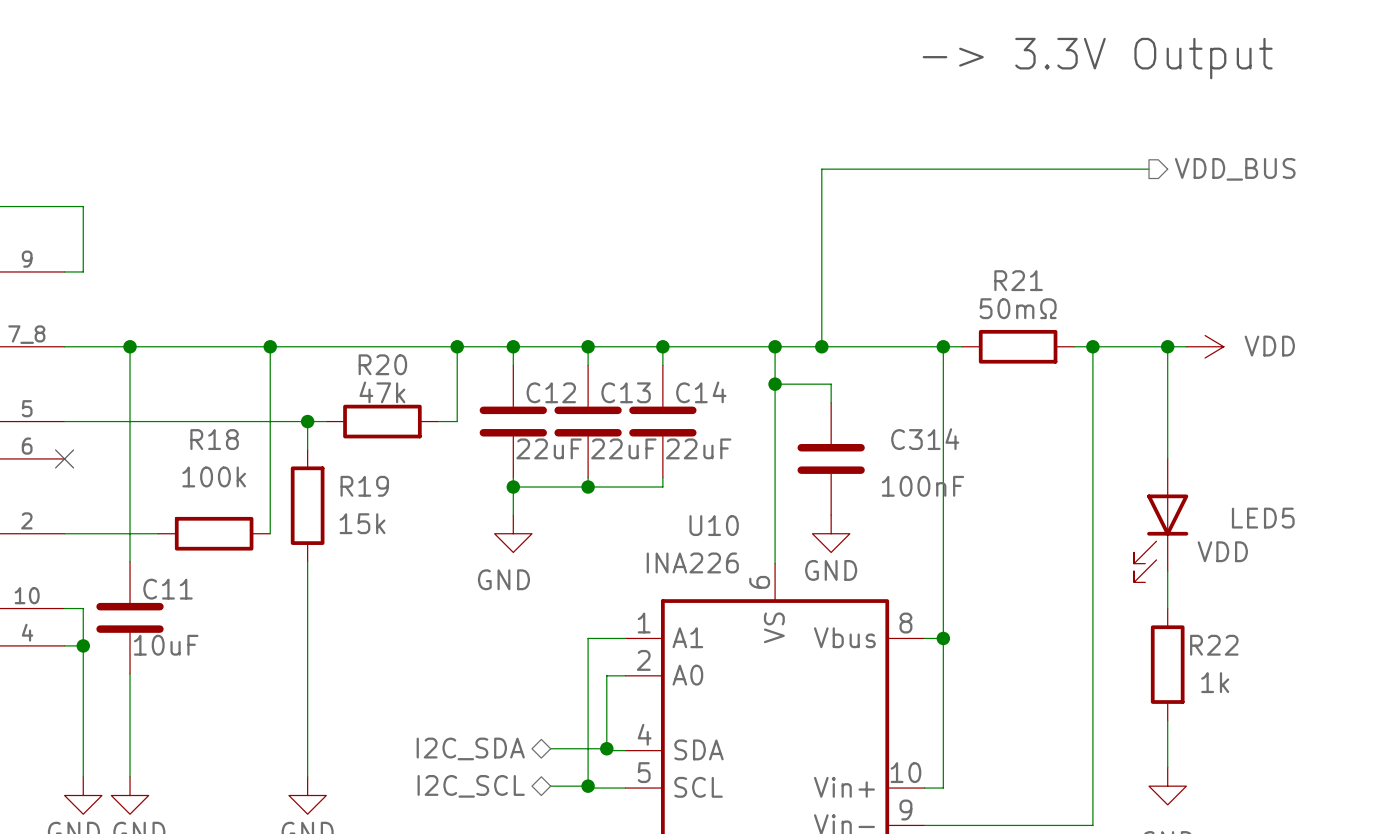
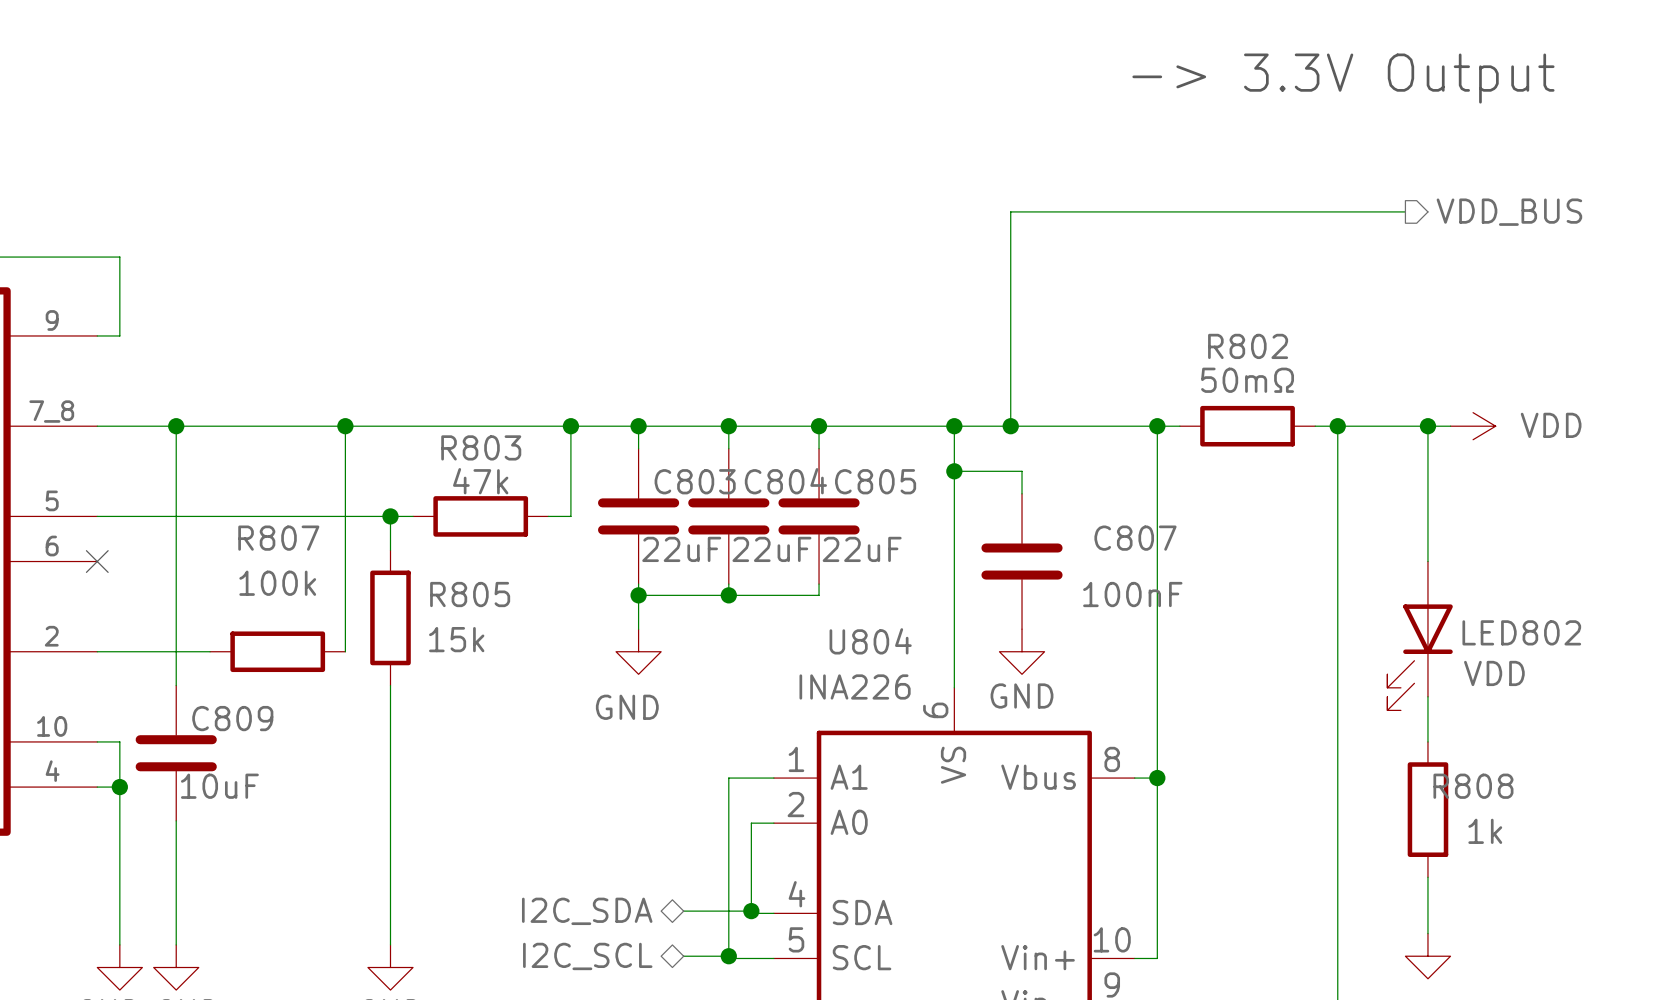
R21 name: R21 (1018, 280) -> R802 (1248, 346)
R20 name: R20 (382, 364) -> R803 (481, 447)
C12 name: C12 (551, 392) -> C803 (695, 481)
C13 name: C13 (626, 392) -> C804 (785, 481)
C14 name: C14 (701, 392) -> C805 (875, 481)
R18 name: R18 (214, 439) -> R807 (278, 538)
C314 name: C314 (925, 439) -> C807 (1135, 538)
R19 name: R19 (364, 486) -> R805 (470, 594)
LED5 name: LED5 (1263, 518) -> LED802 (1521, 632)
U10 name: U10 (714, 525) -> U804 (870, 641)
C11 name: C11 (167, 589) -> C809 (232, 718)
R22 name: R22 (1214, 645) -> R808 (1473, 786)

